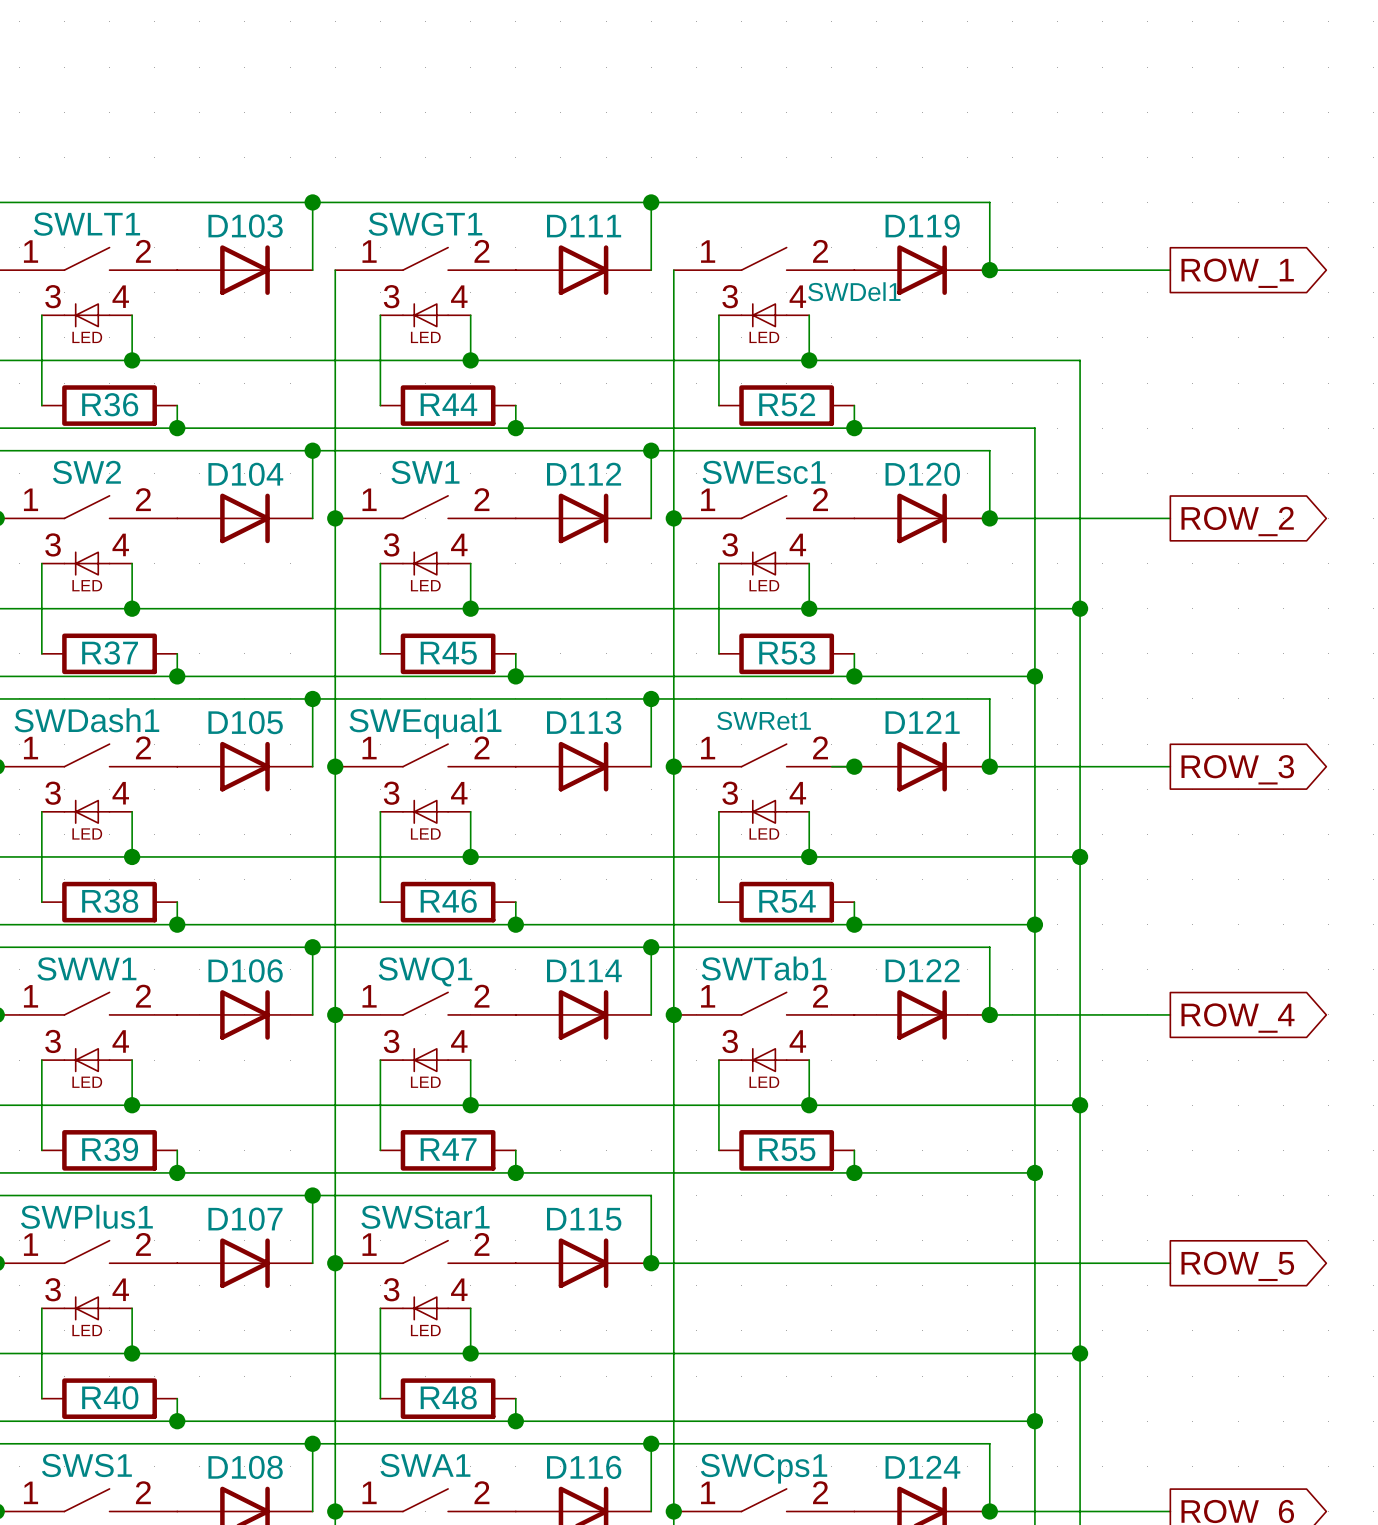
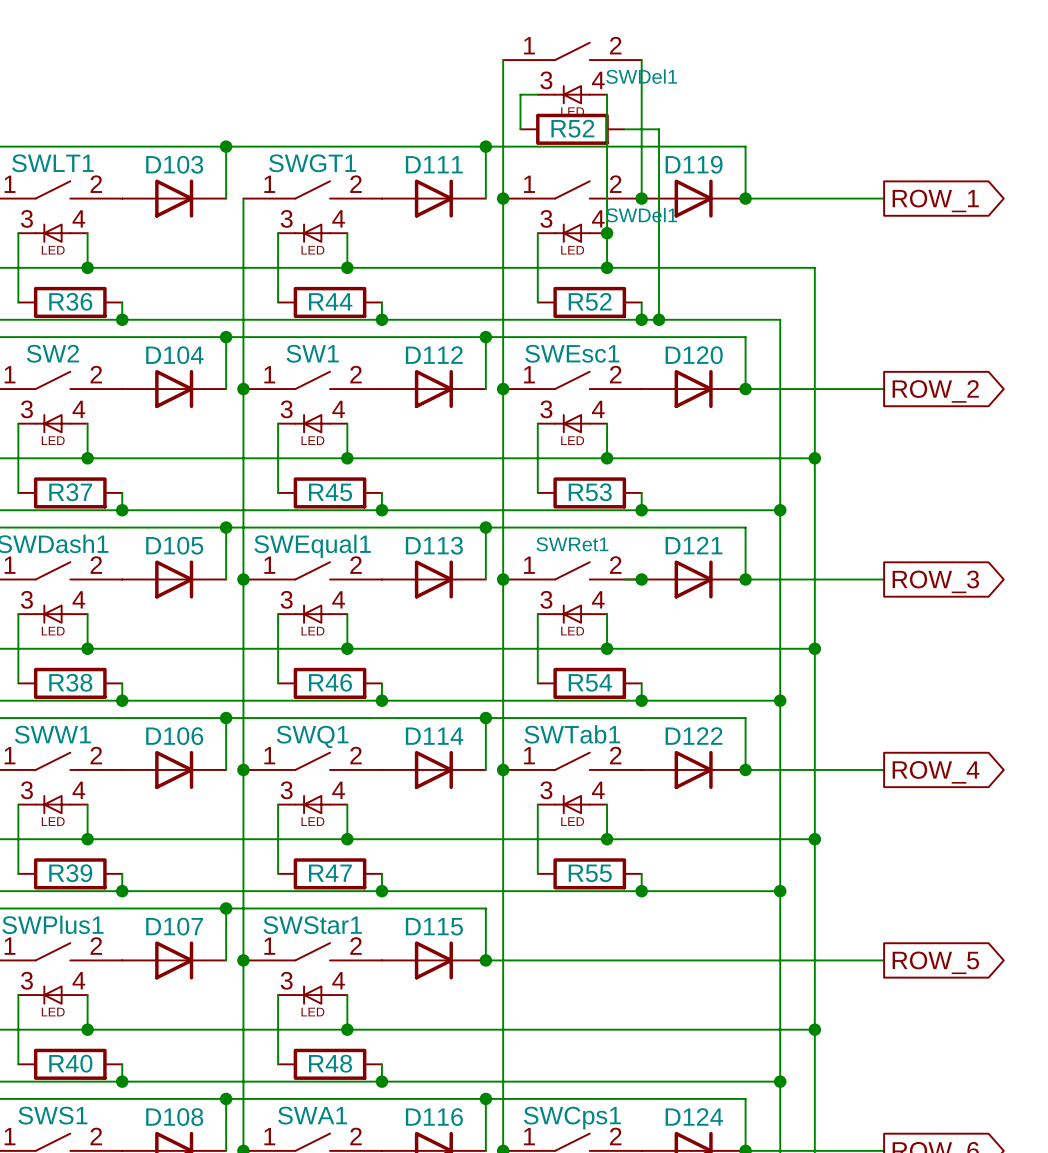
wire: none -> (503, 60) (503, 198)
wire: none -> (641, 60) (641, 198)
SWDel1: none -> (572, 73)
wire: none -> (537, 94) (520, 94) (520, 129)
wire: none -> (607, 94) (607, 233)
R52: none -> (572, 129)
wire: none -> (624, 129) (659, 129) (659, 319)
junction: none -> (503, 198)
junction: none -> (641, 198)
junction: none -> (607, 233)
junction: none -> (659, 319)

